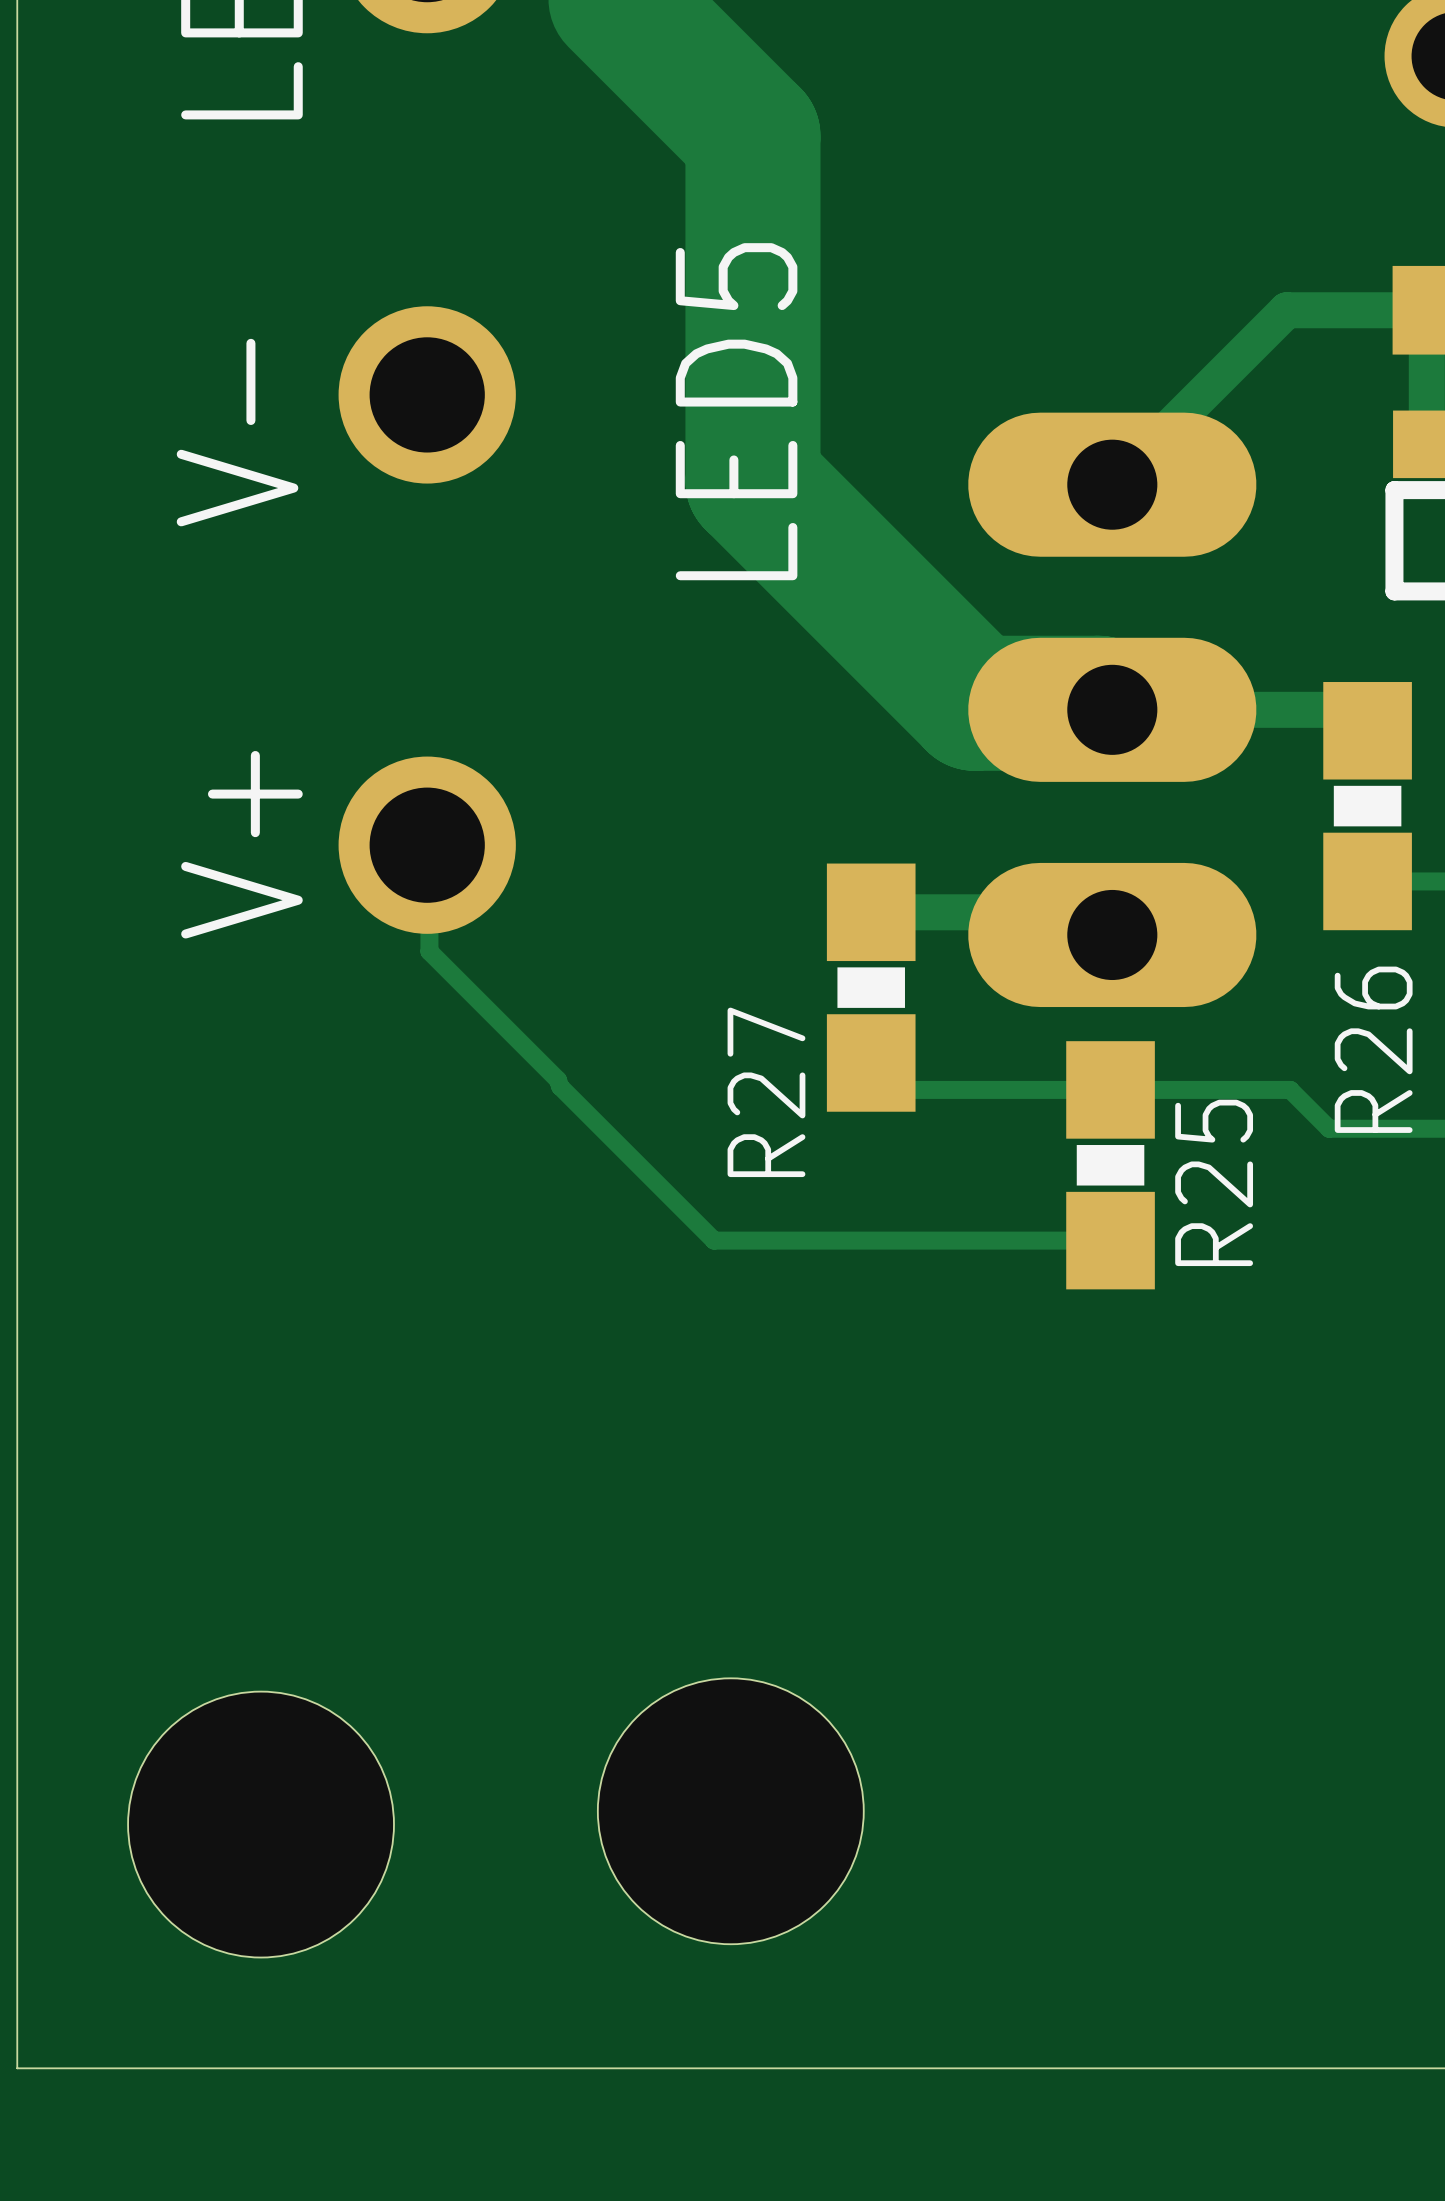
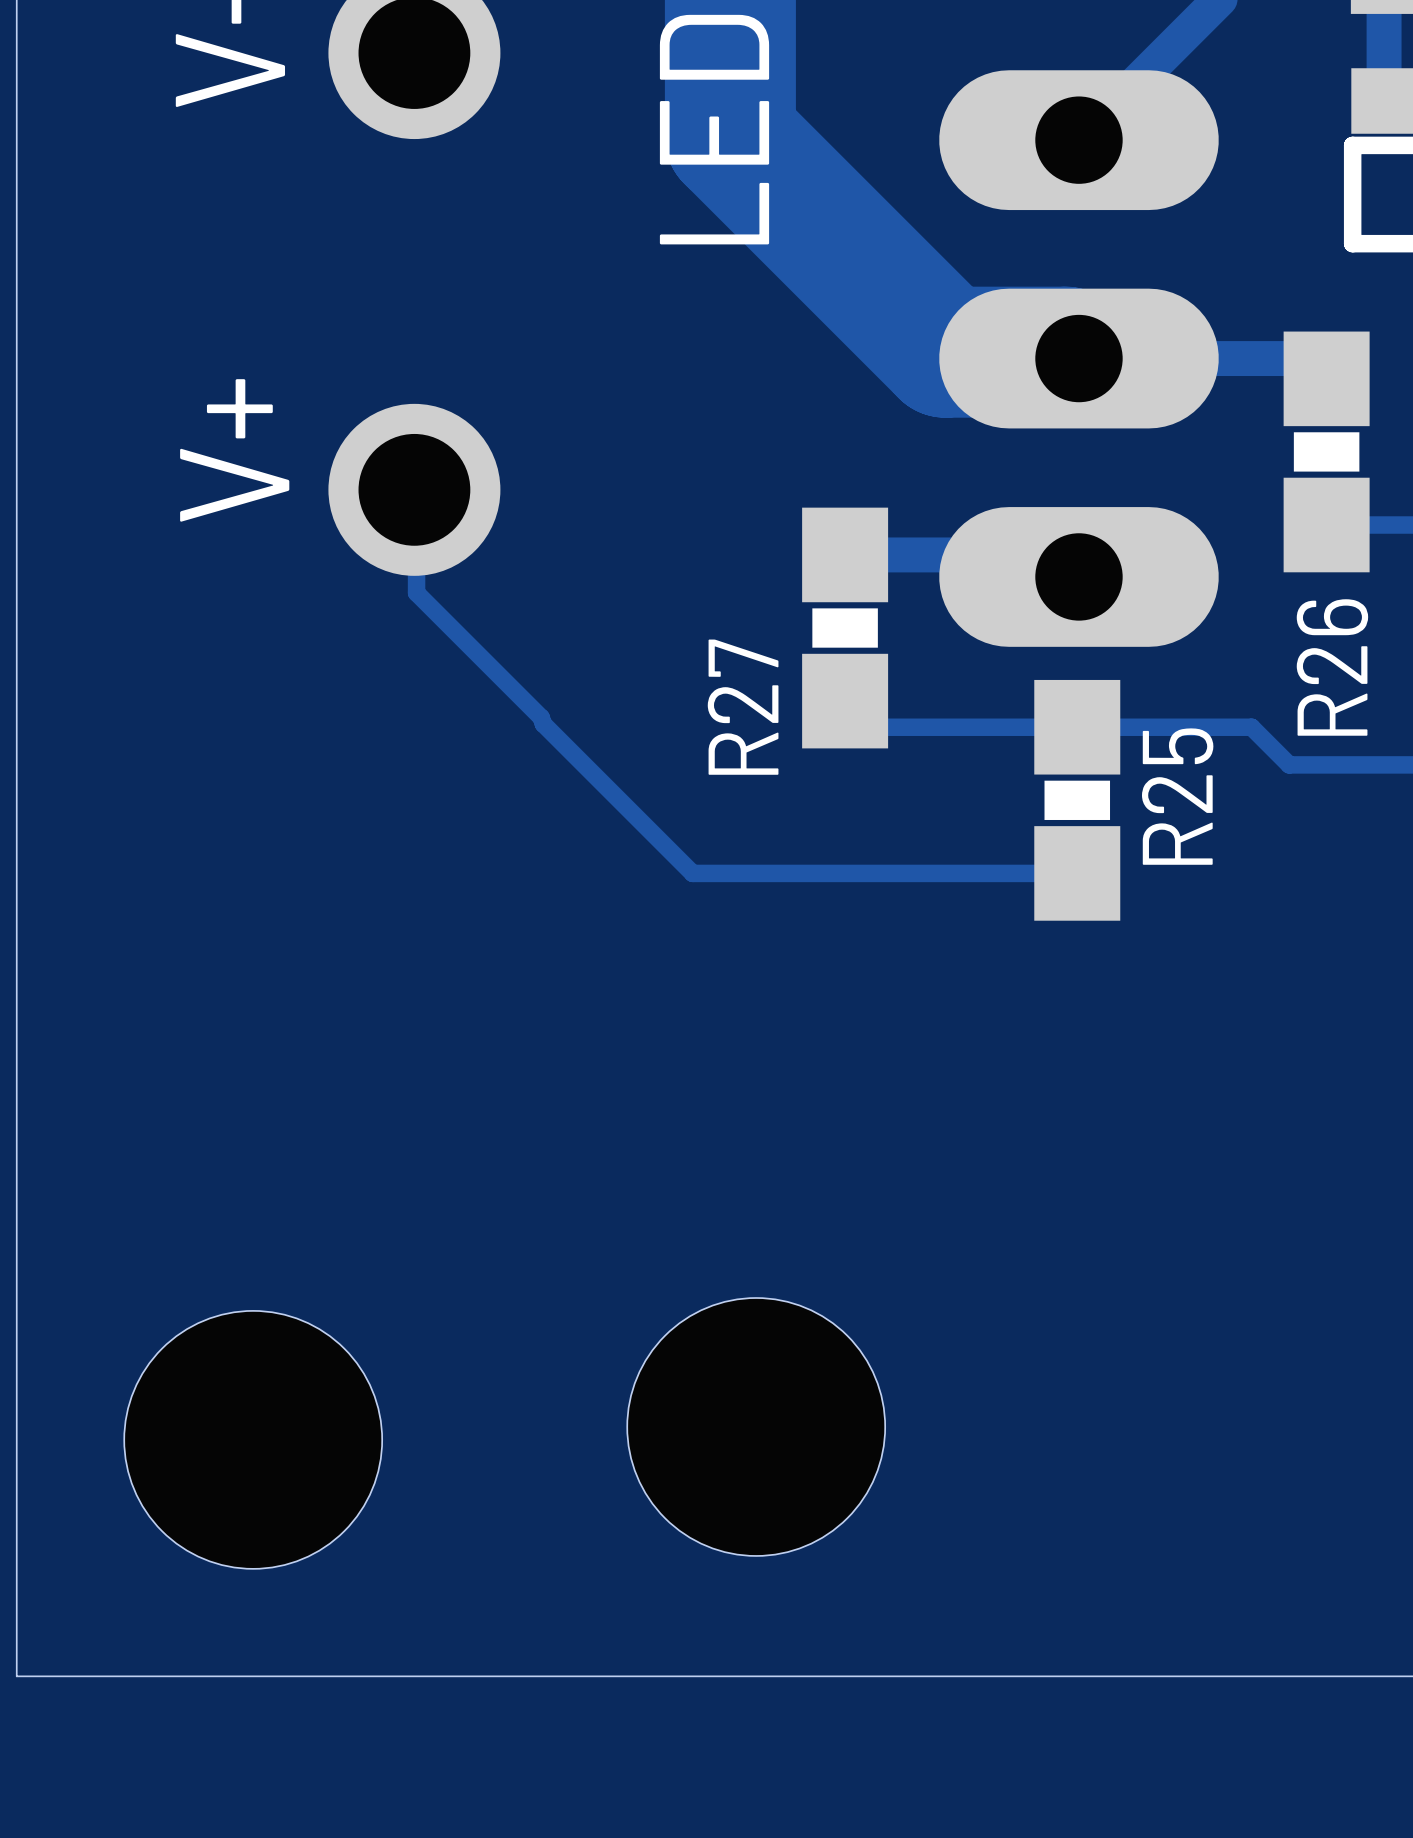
hole position: (730, 1811) -> (756, 1426)

